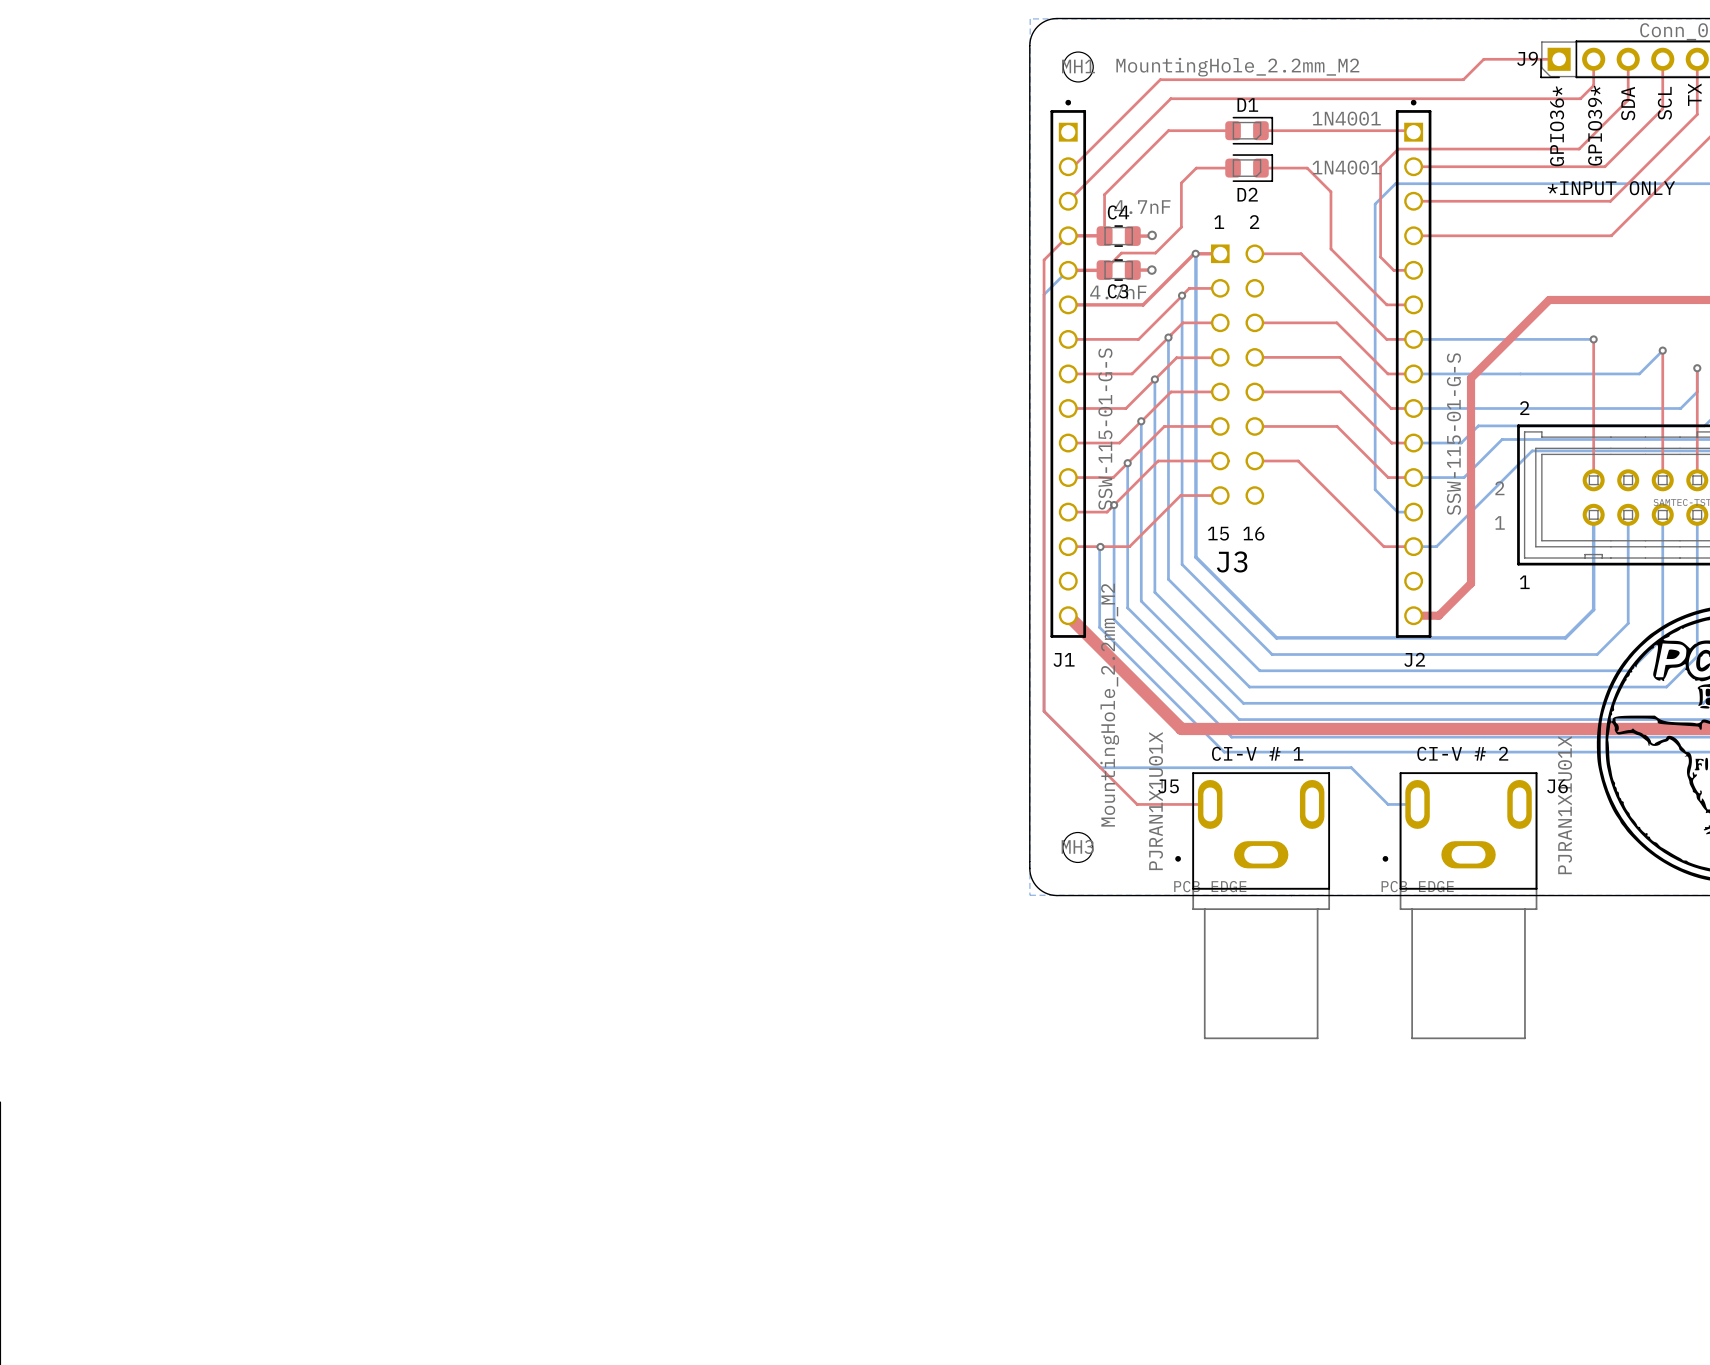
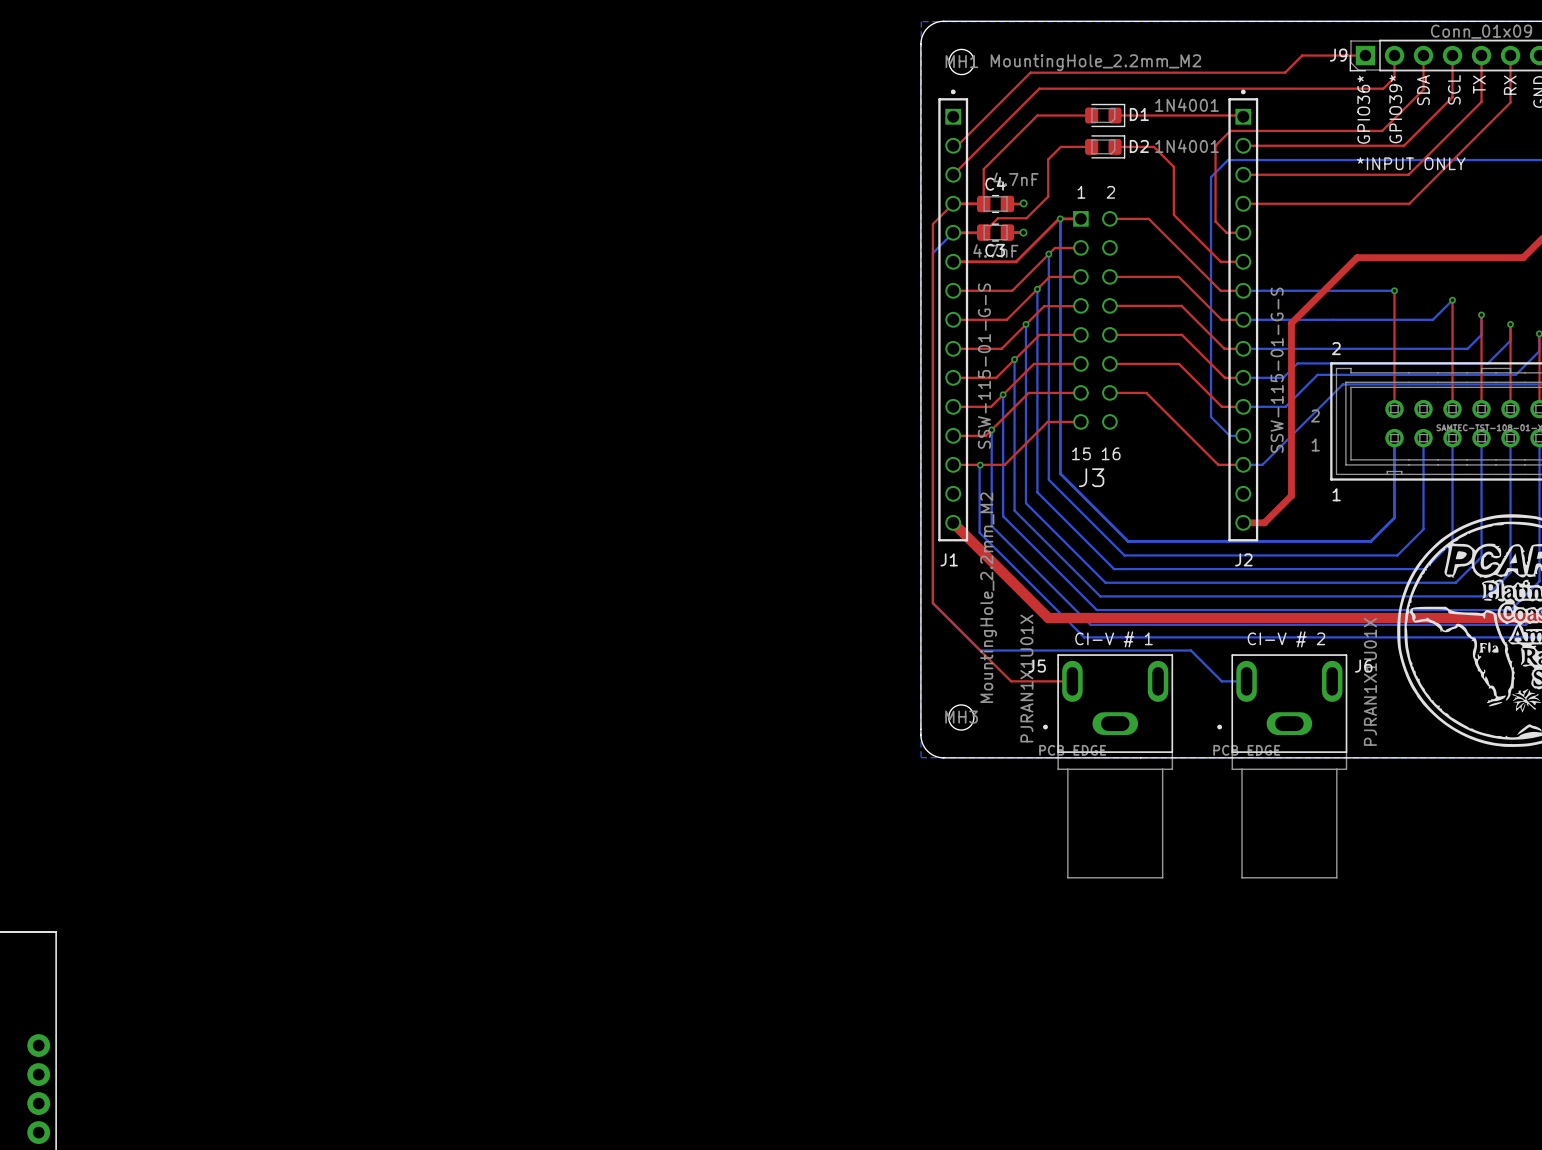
D1 name position: D1 (1247, 105) -> D1 (1139, 114)
D2 name position: D2 (1247, 194) -> D2 (1139, 146)

